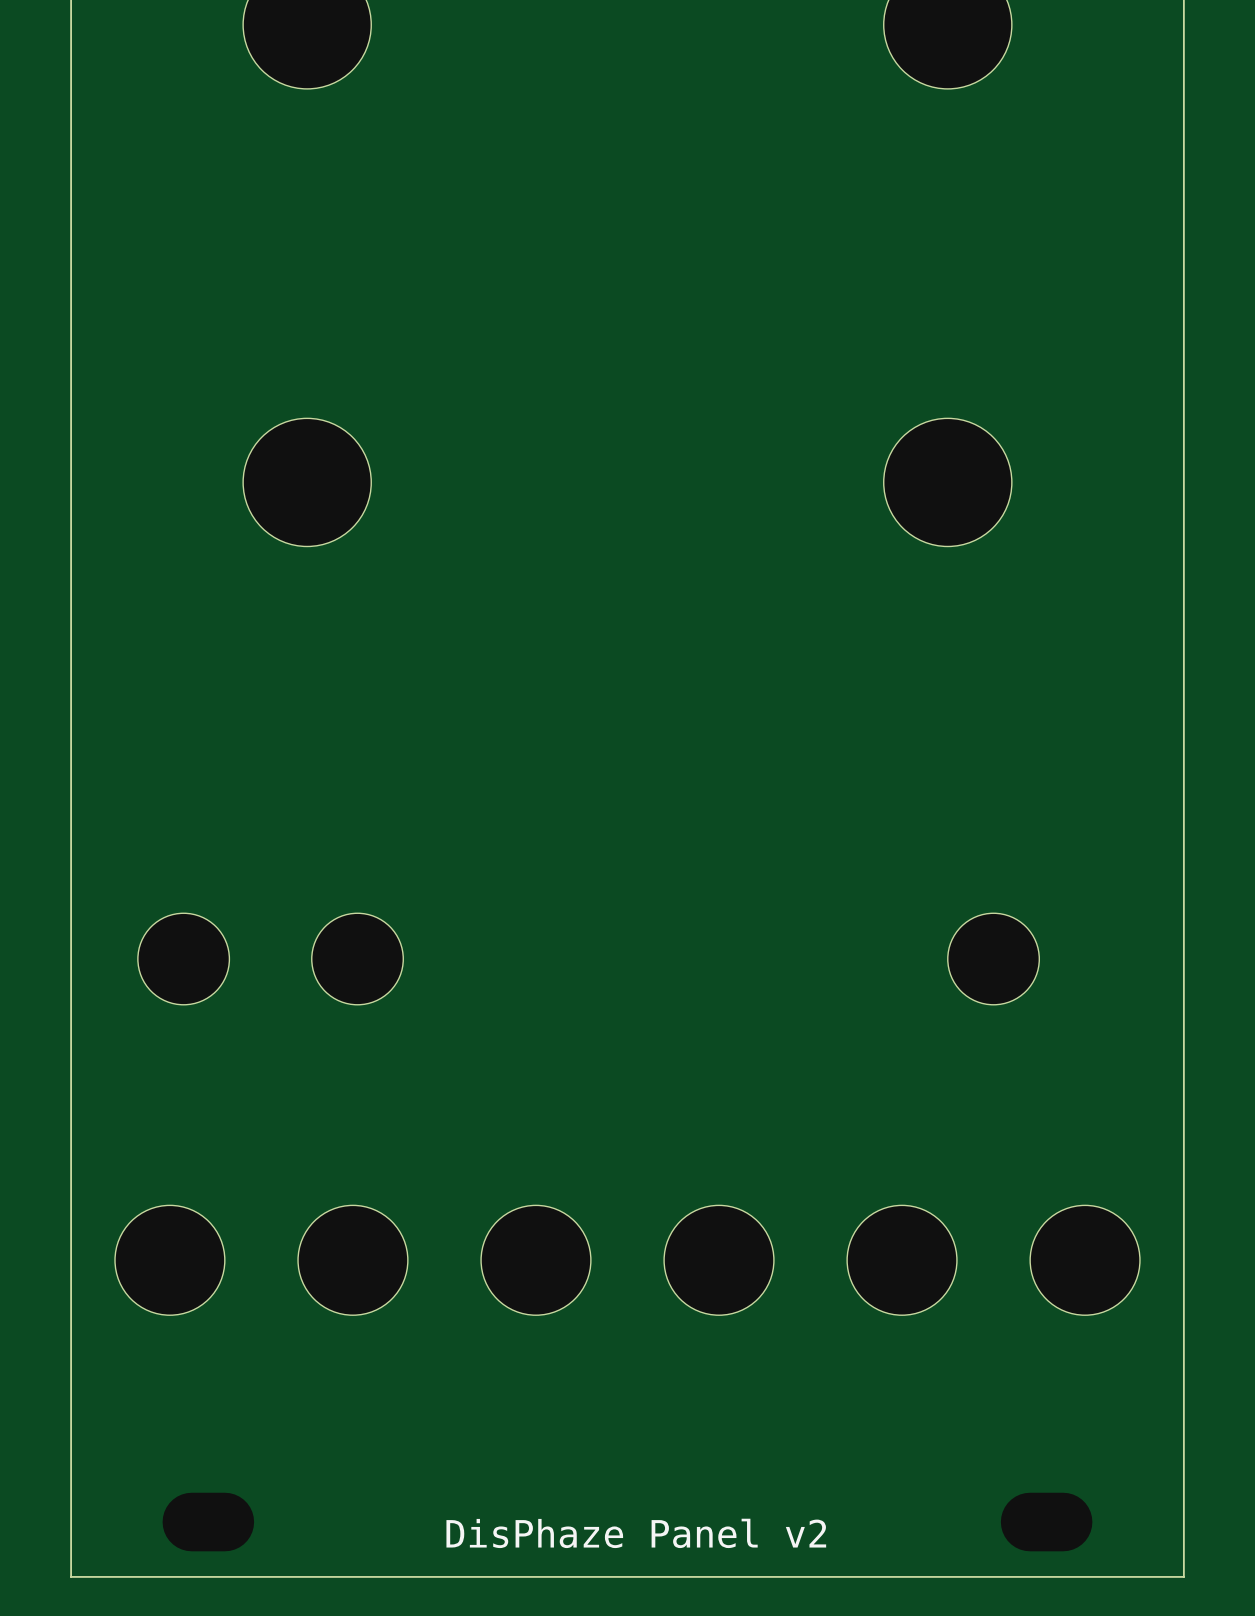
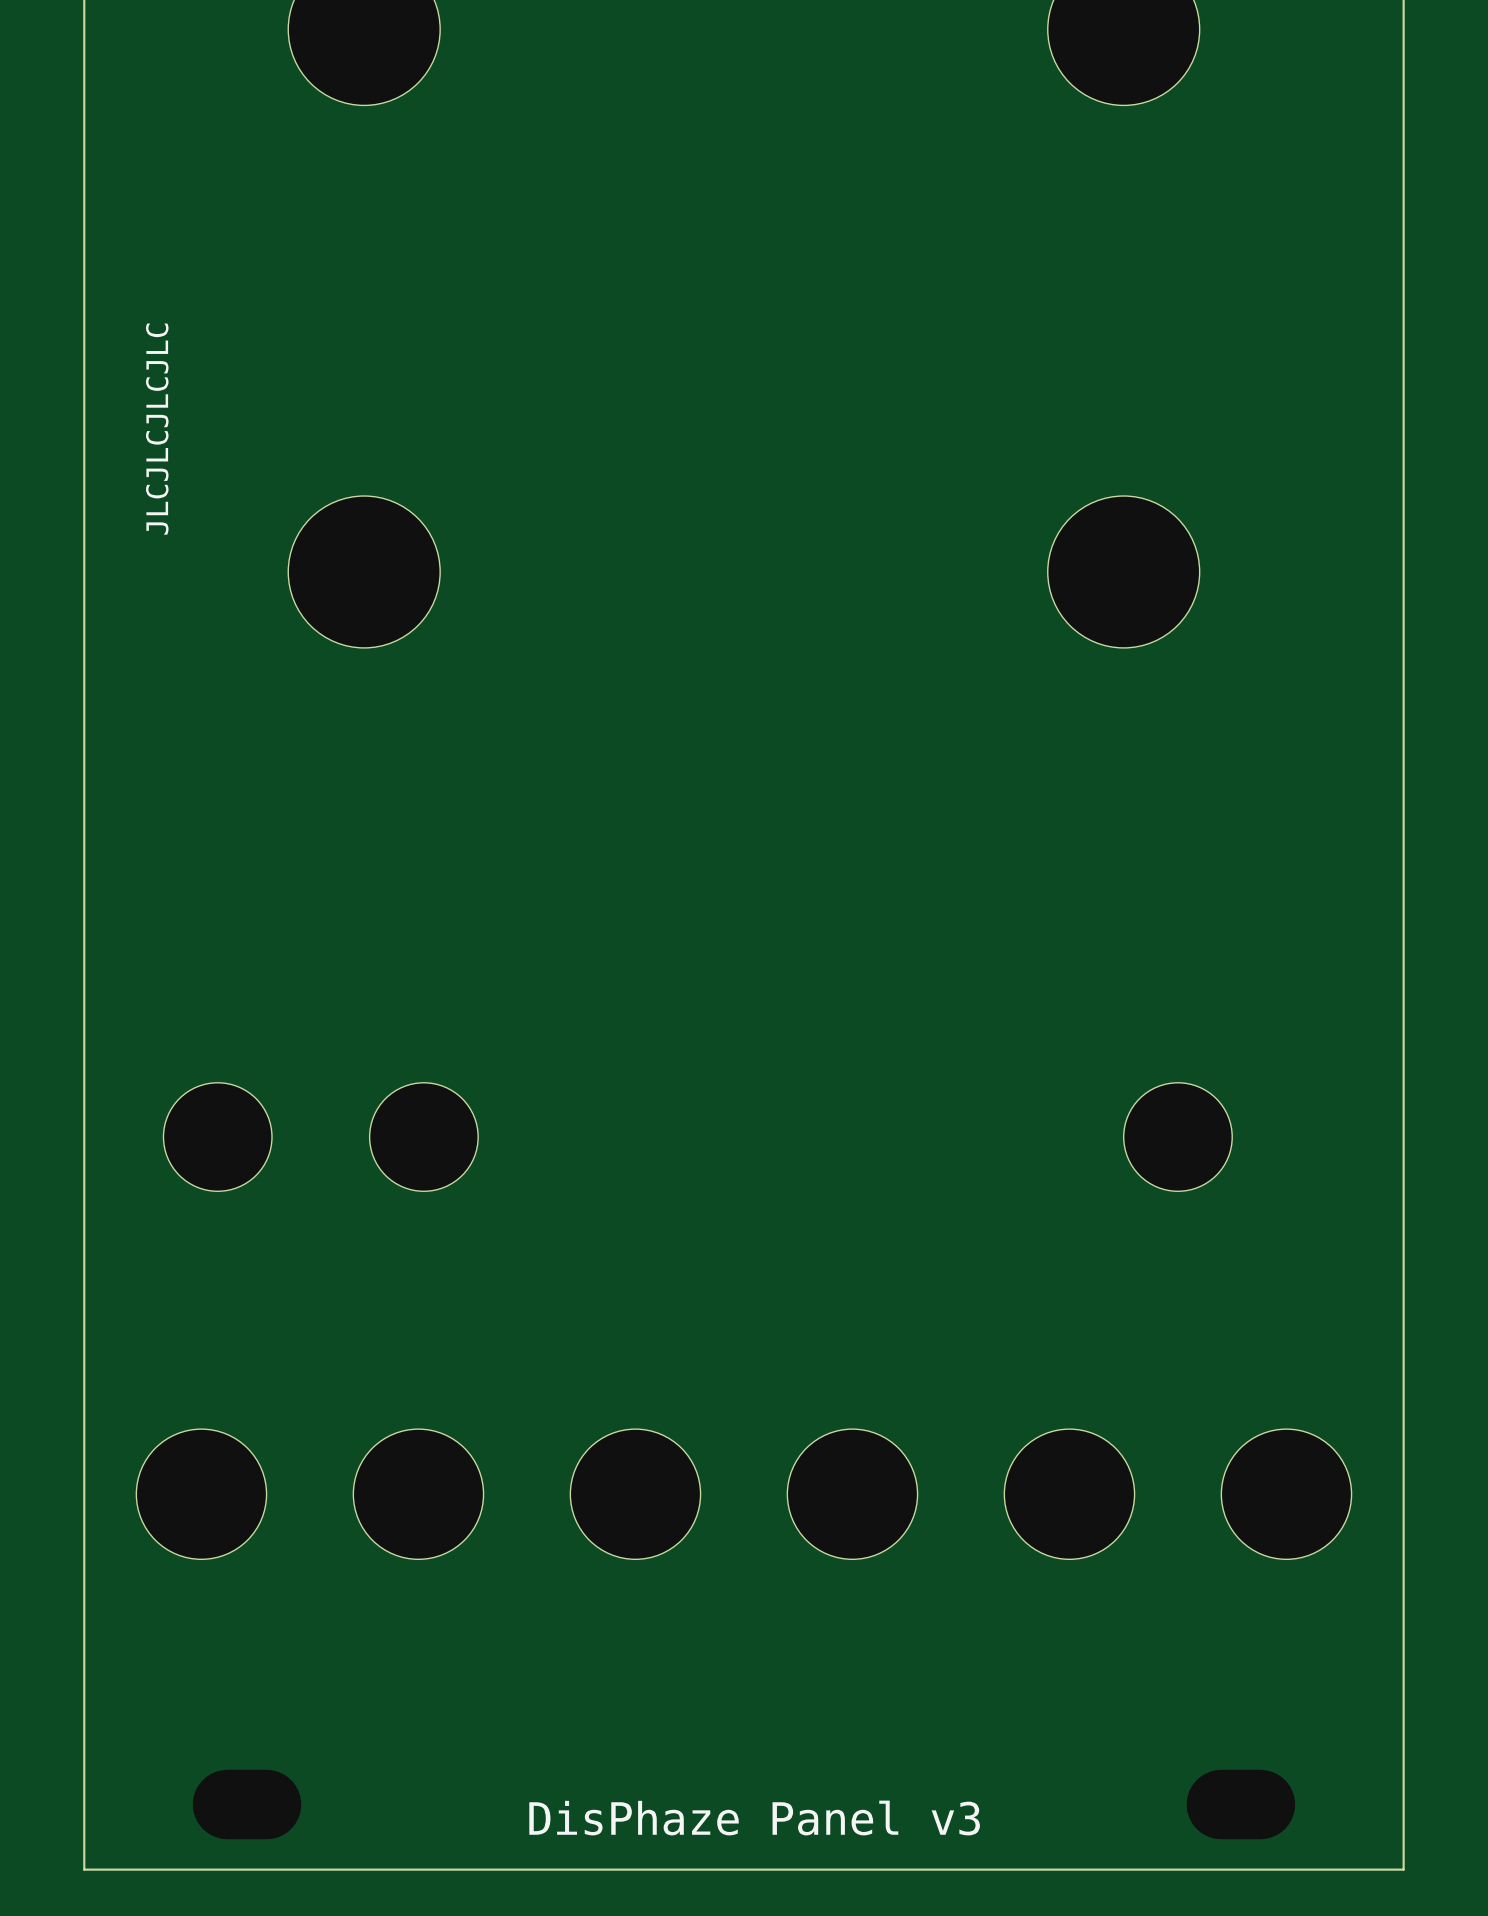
text: none -> JLCJLCJLCJLC (157, 429)
text: DisPhaze Panel v2 (636, 1533) -> DisPhaze Panel v3 (754, 1818)

